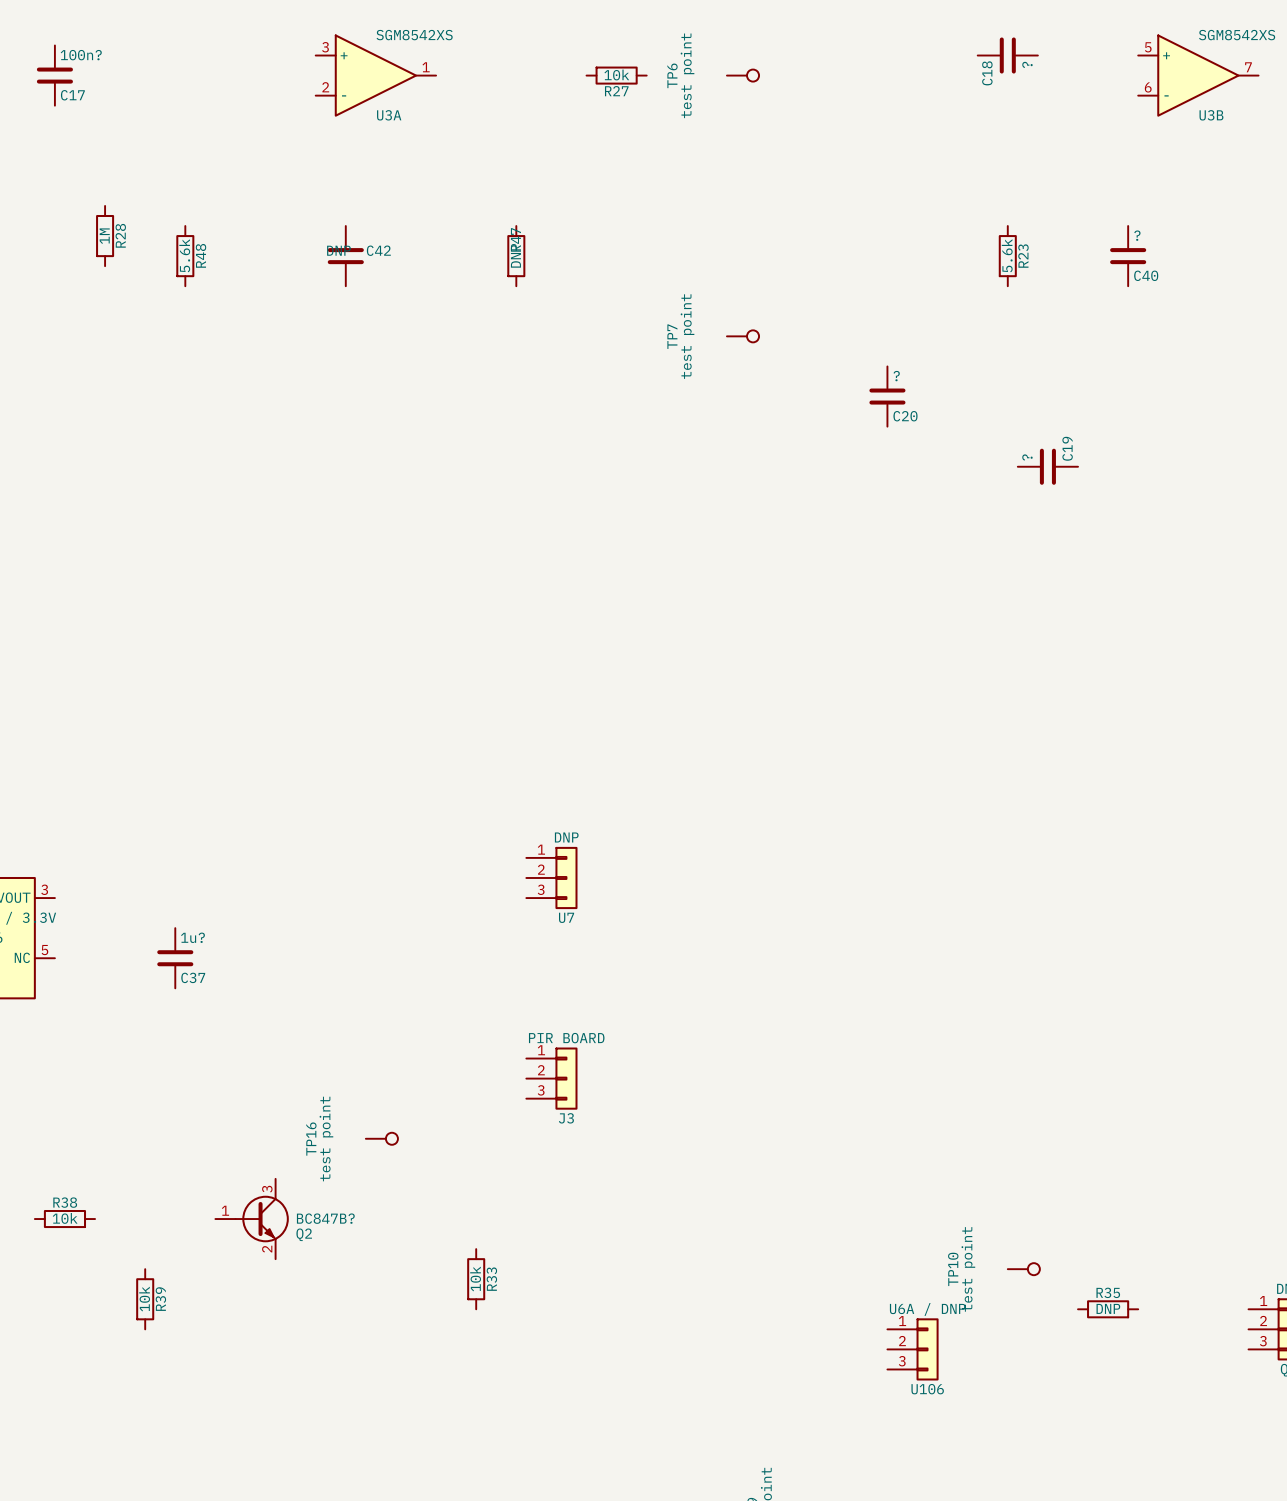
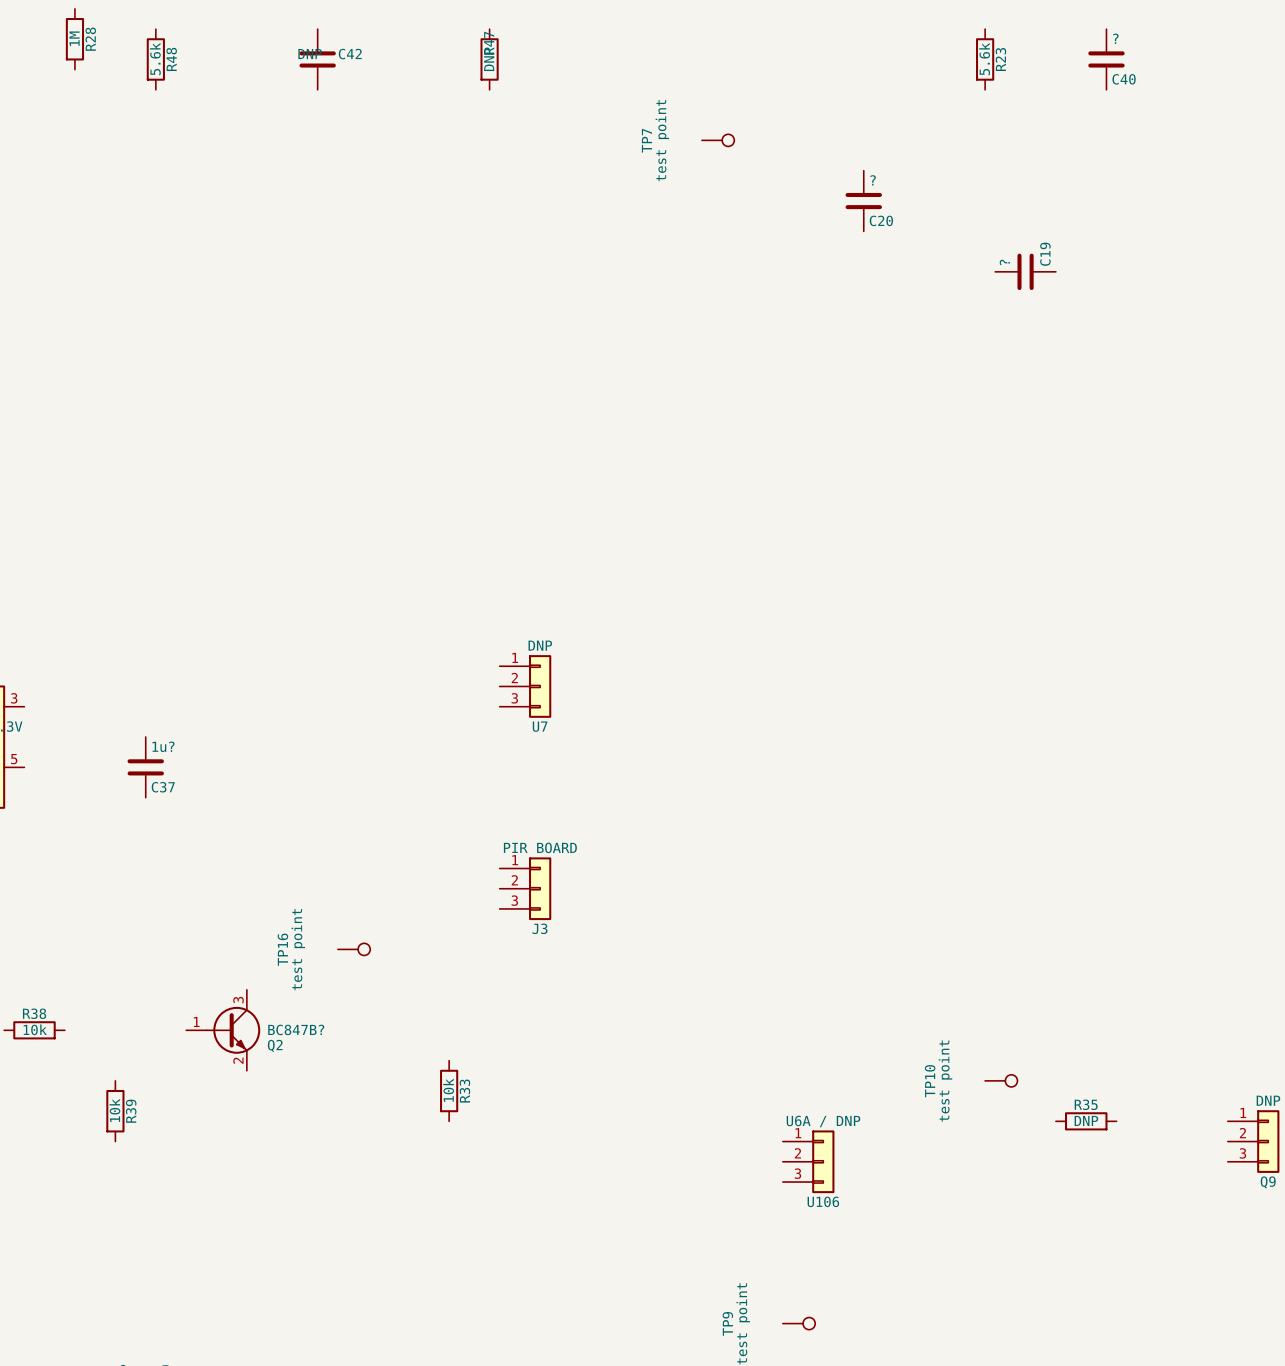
U106 position: (913, 1349) -> (808, 1161)

